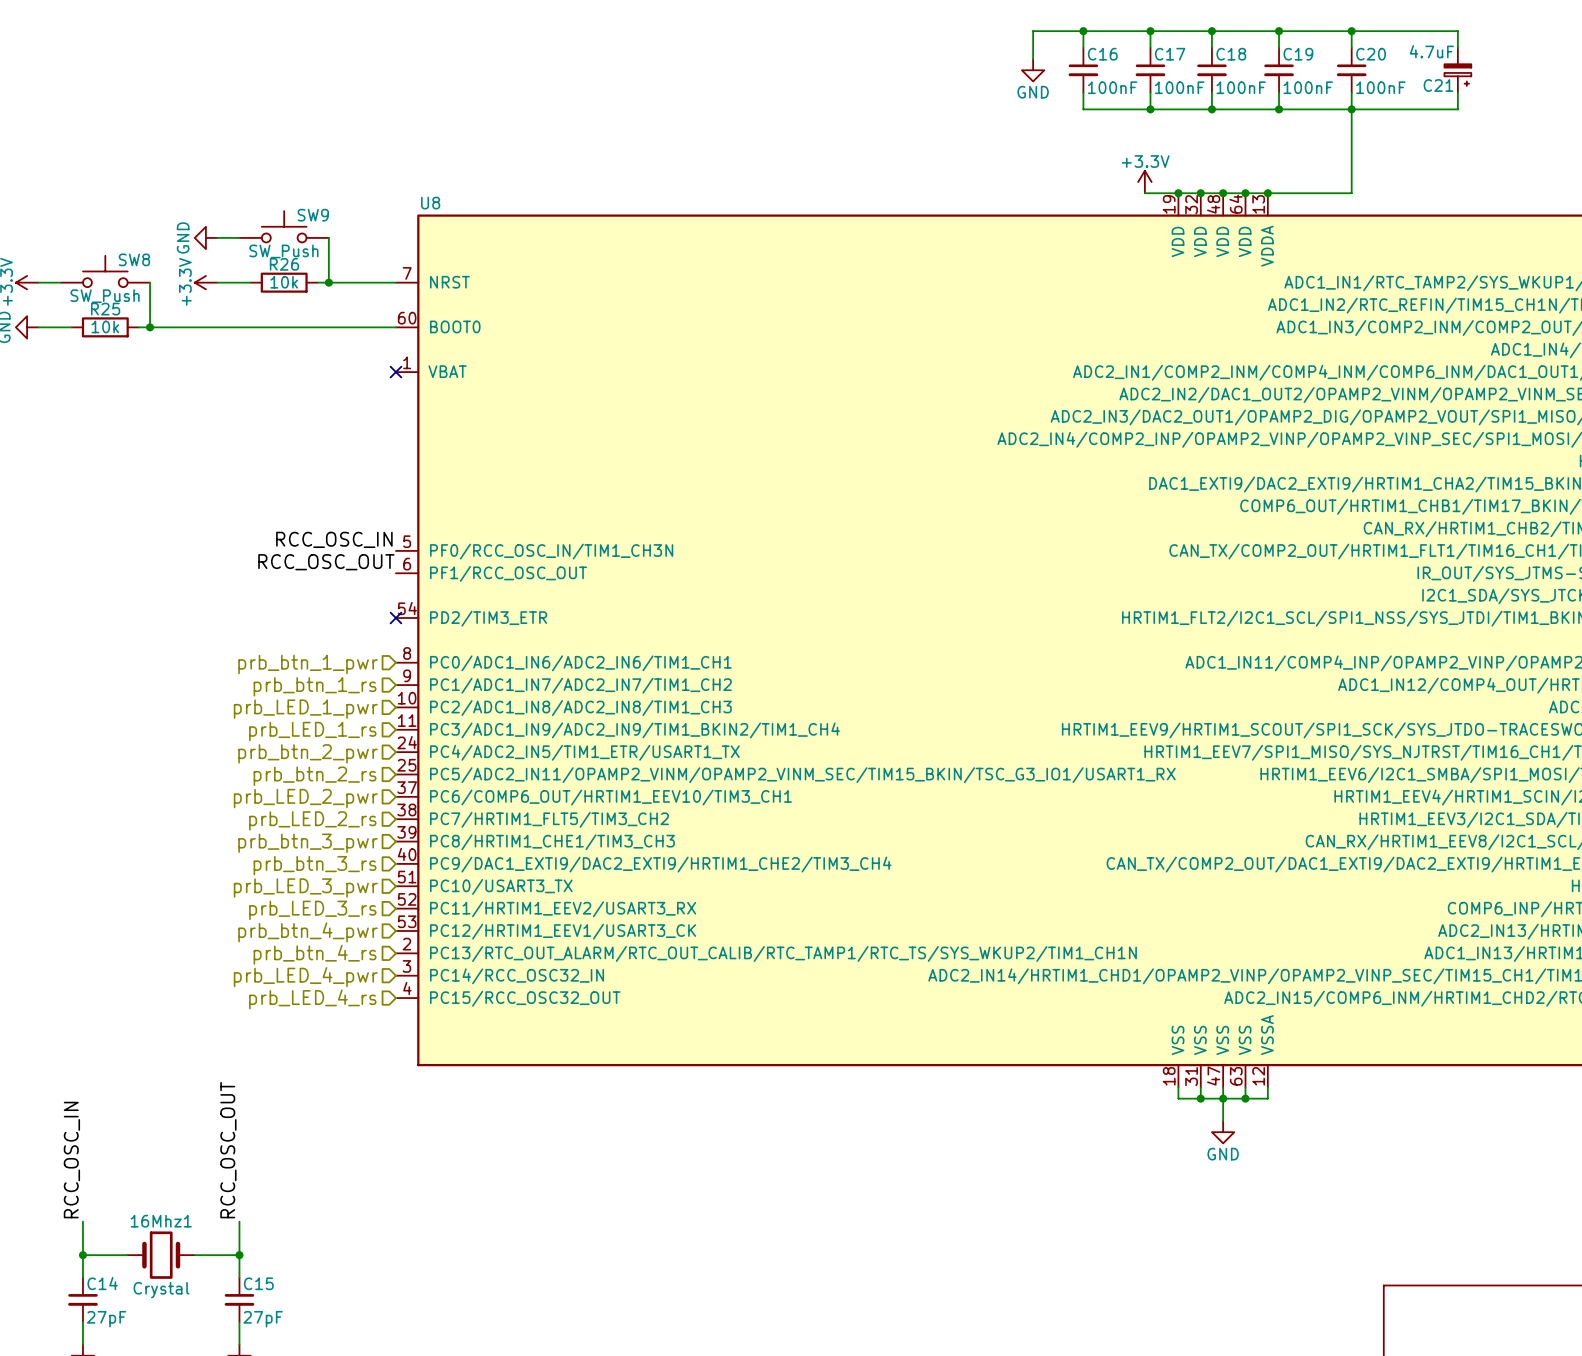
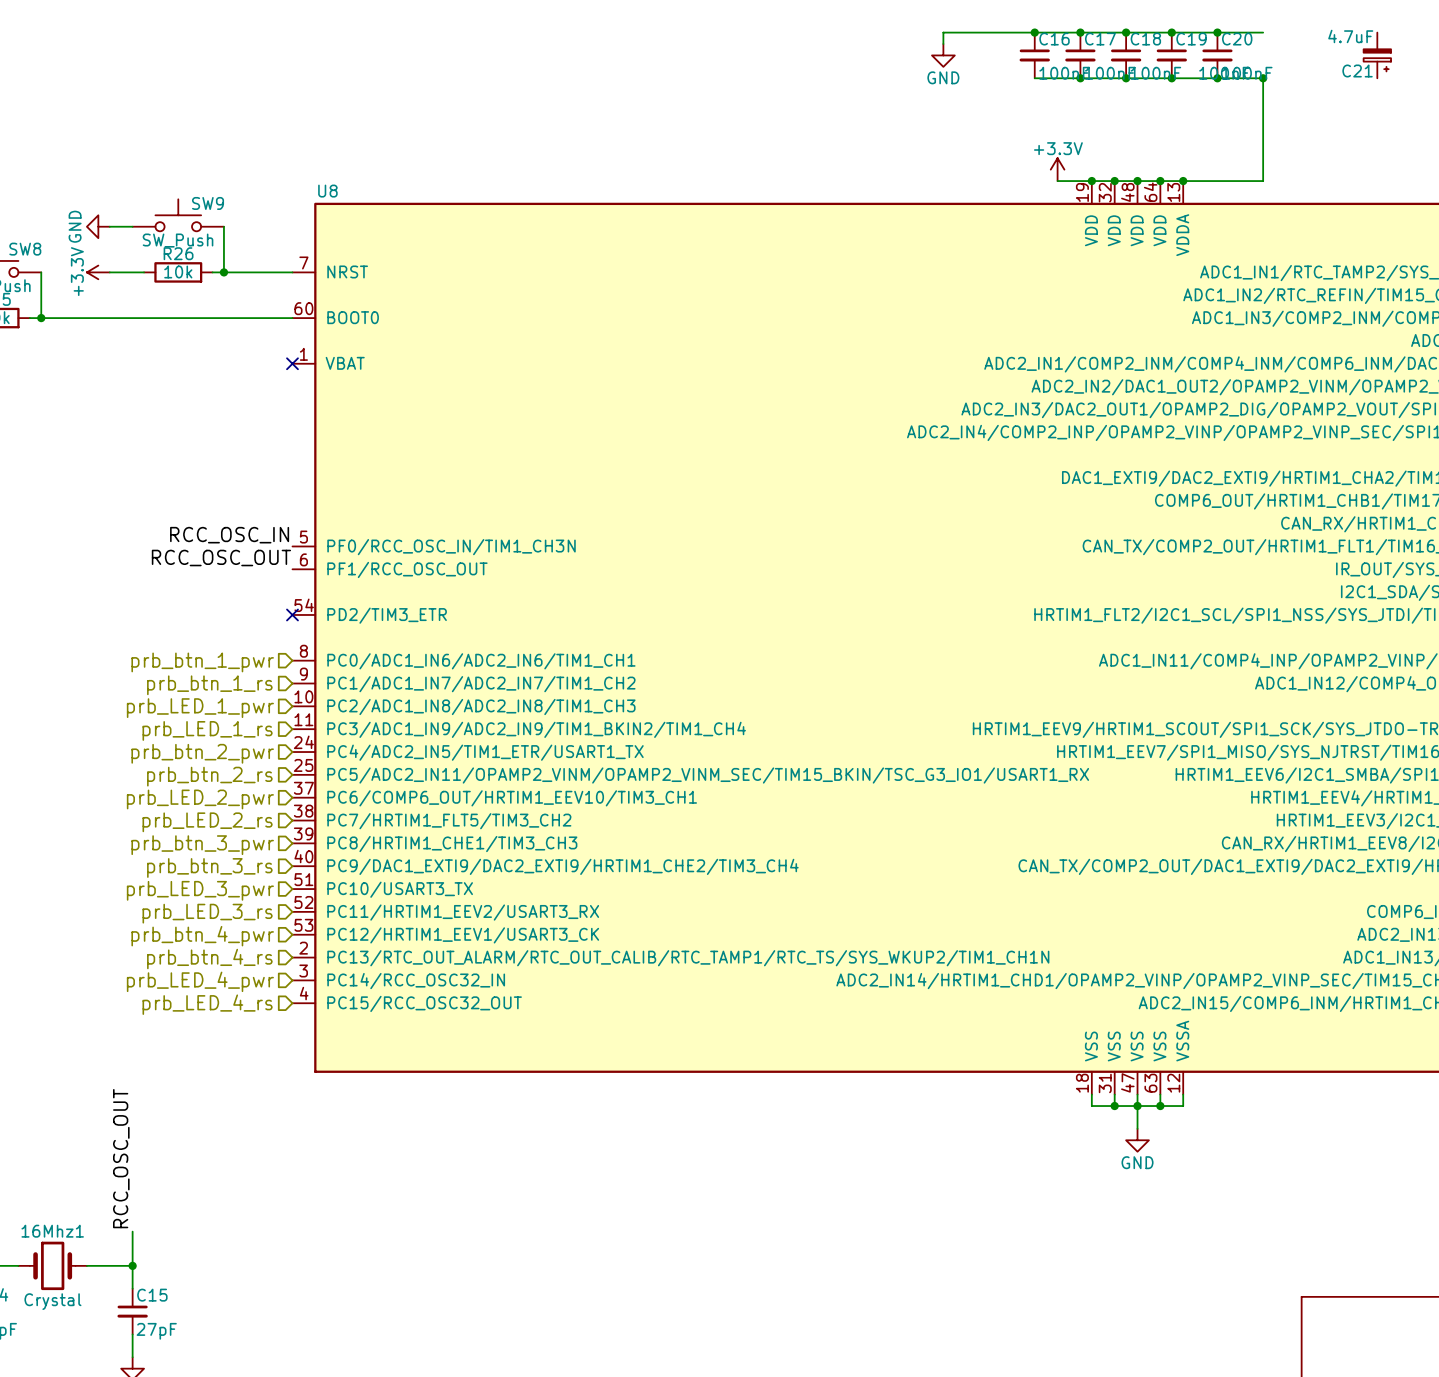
wire: (1083, 31) (1083, 47) -> none
junction: (1083, 31) -> none
wire: (1150, 31) (1150, 47) -> none
junction: (1150, 31) -> none
wire: (1211, 31) (1211, 47) -> none
junction position: (1211, 31) -> (1126, 32)
wire: (1279, 31) (1279, 47) -> none
junction: (1279, 31) -> none
wire: (1351, 31) (1351, 47) -> none
junction: (1351, 31) -> none
wire: (1033, 47) (1033, 31) (1457, 31) (1457, 47) -> (943, 32) (1263, 32)
junction: none -> (1034, 32)
junction: none -> (1080, 32)
junction: none -> (1171, 32)
junction: none -> (1217, 32)
C16 position: (1083, 70) -> (1034, 55)
C17 position: (1150, 70) -> (1080, 55)
C19 position: (1279, 70) -> (1171, 55)
C20 position: (1351, 70) -> (1217, 55)
wire: (1083, 92) (1083, 109) (1457, 109) (1457, 92) -> none
wire: (1150, 92) (1150, 109) -> none
wire: (1211, 92) (1211, 109) -> none
junction: none -> (1171, 78)
wire: (1279, 92) (1279, 109) -> none
junction: none -> (1217, 78)
wire: (1351, 92) (1351, 193) (1346, 193) -> (1034, 78) (1263, 78) (1263, 181)
junction position: (1150, 109) -> (1080, 78)
junction position: (1211, 109) -> (1126, 78)
junction: (1279, 109) -> none
junction position: (1351, 109) -> (1263, 78)

